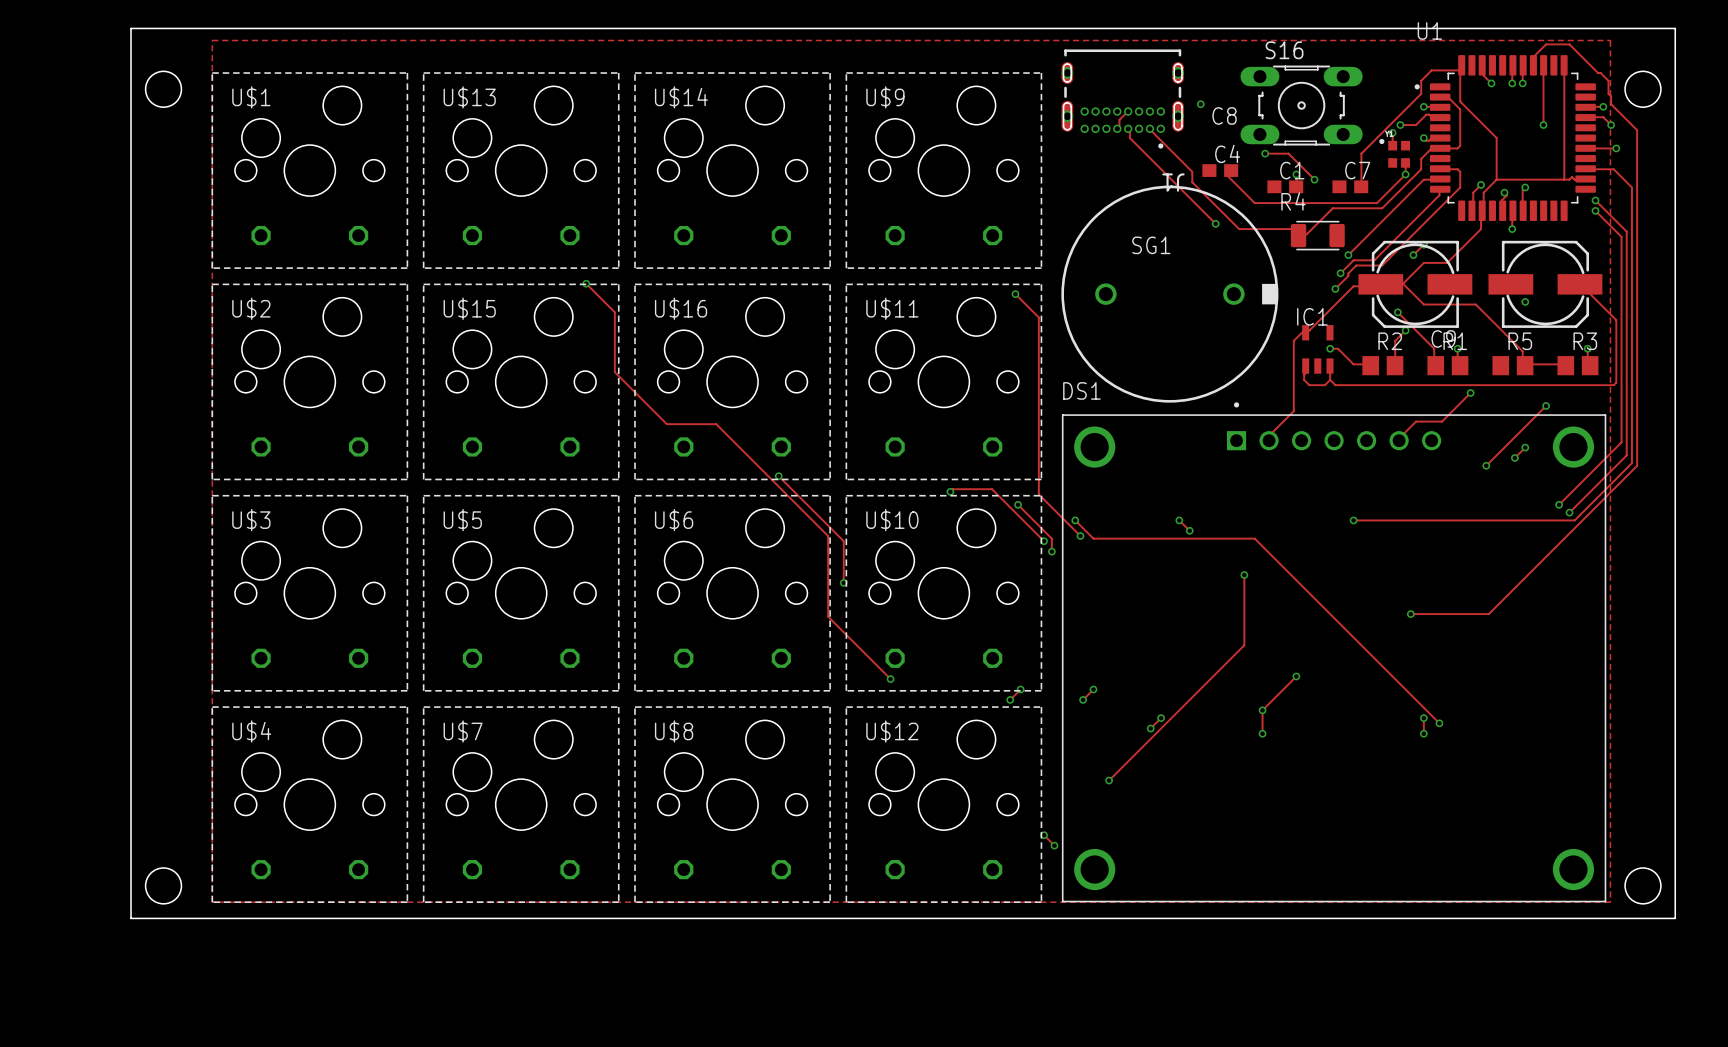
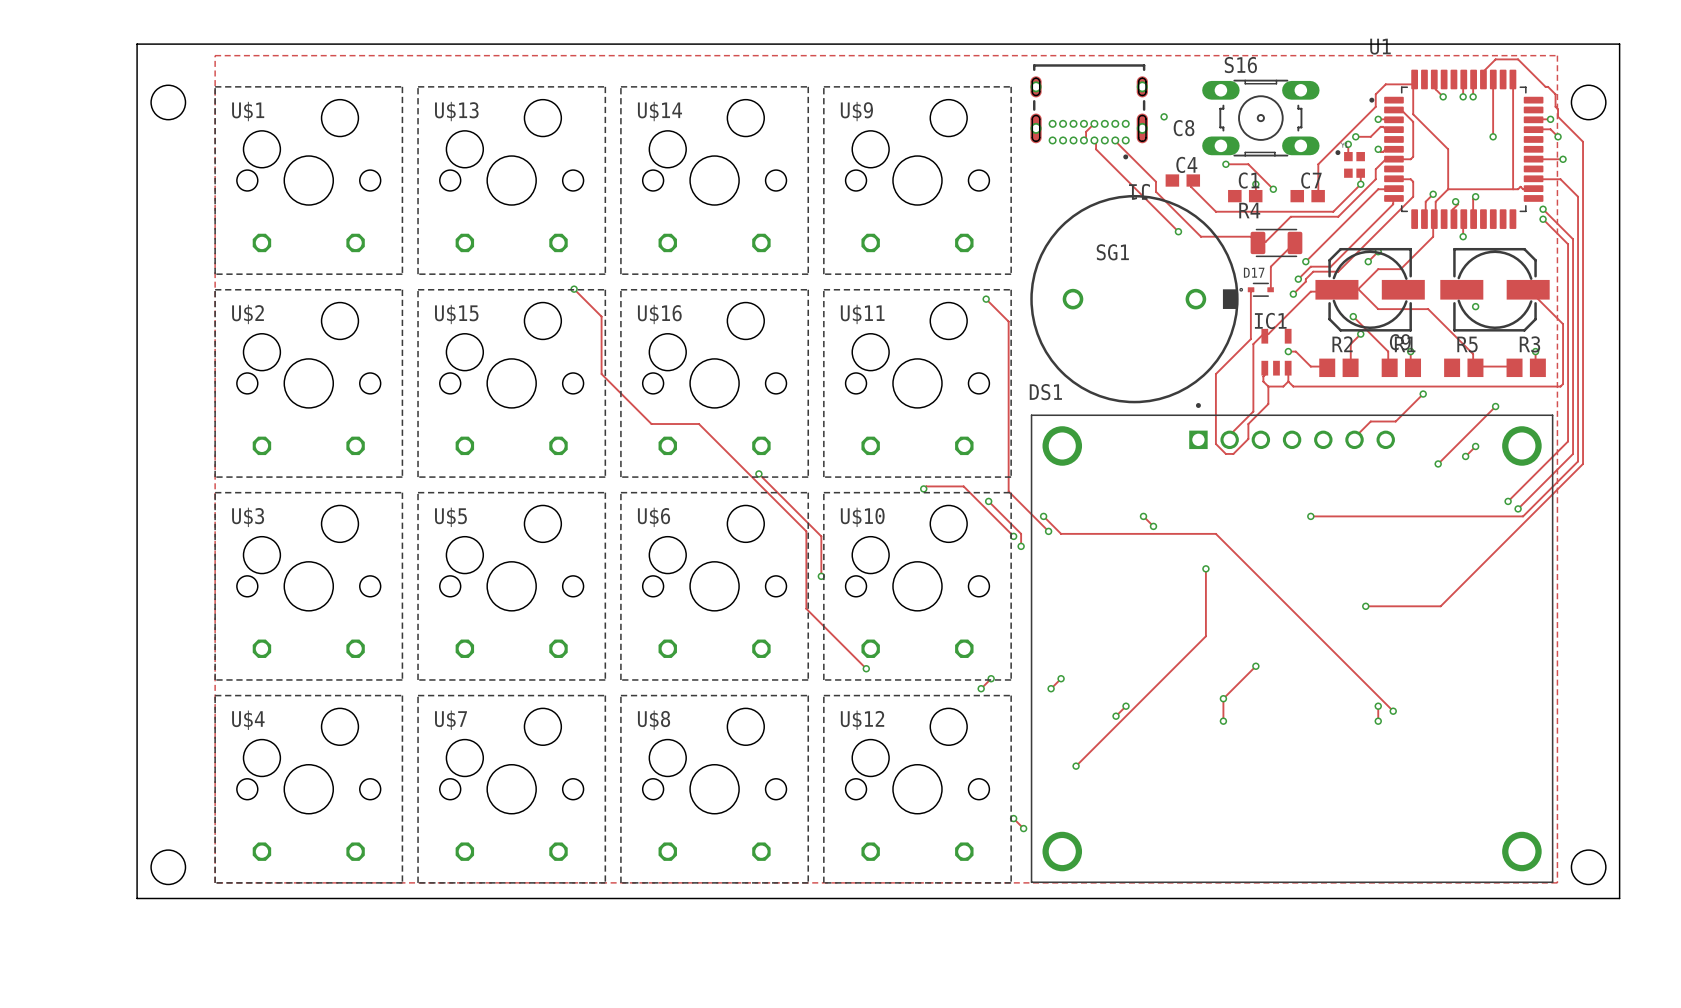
track: none -> (1294, 242) (1270, 266) (1270, 289)
track: none -> (1251, 289) (1250, 339) (1215, 374) (1215, 443) (1225, 453) (1233, 453) (1248, 438) (1248, 424) (1268, 404) (1268, 386)
D17: none -> (1256, 289)

